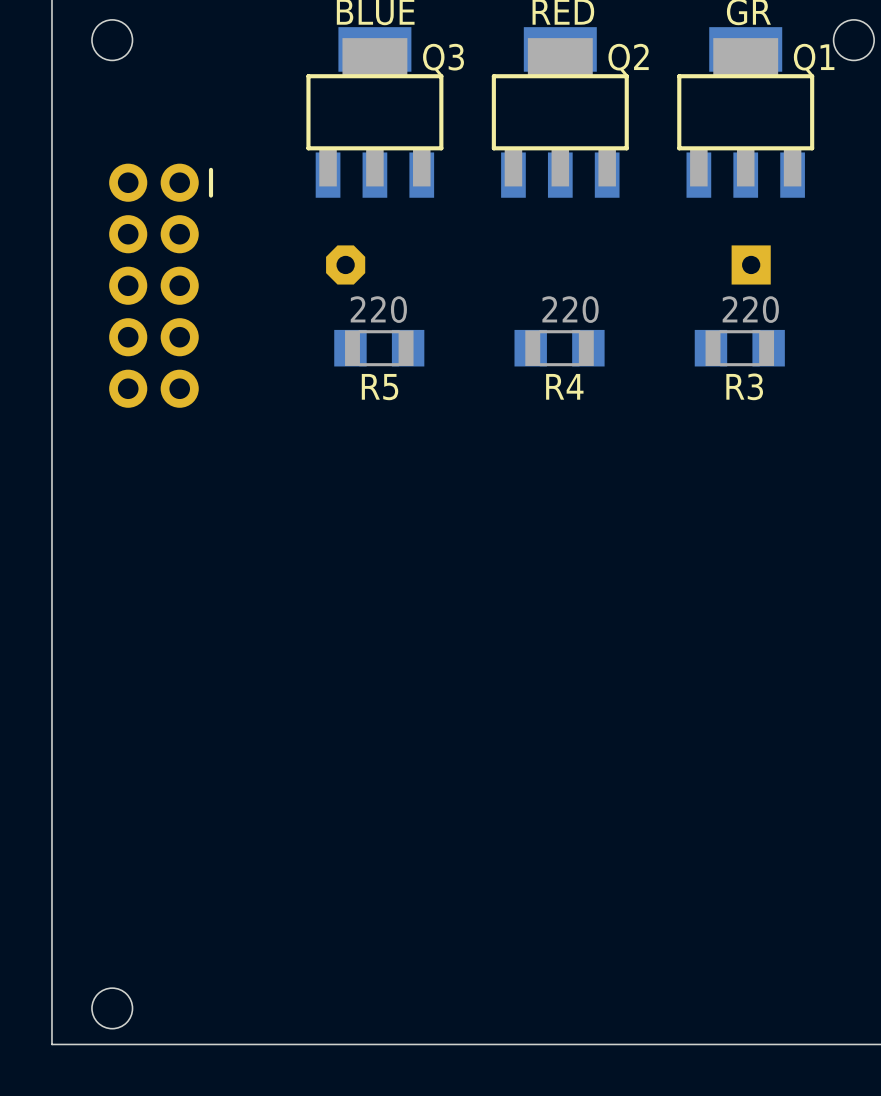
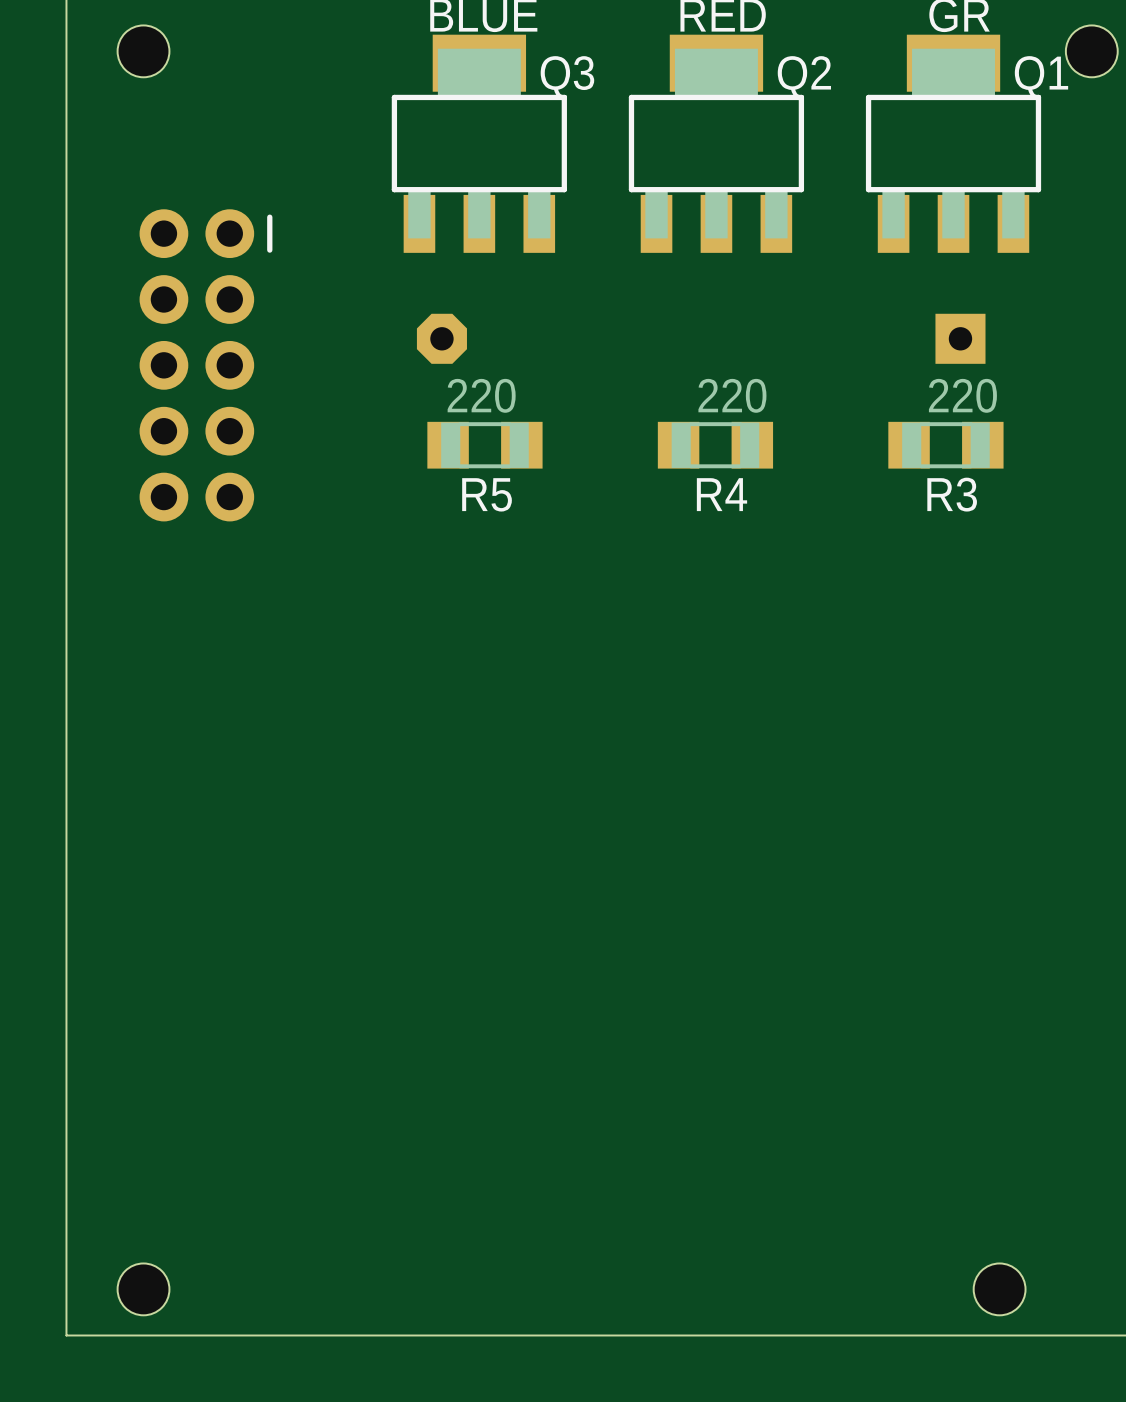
hole: none -> (999, 1289)

